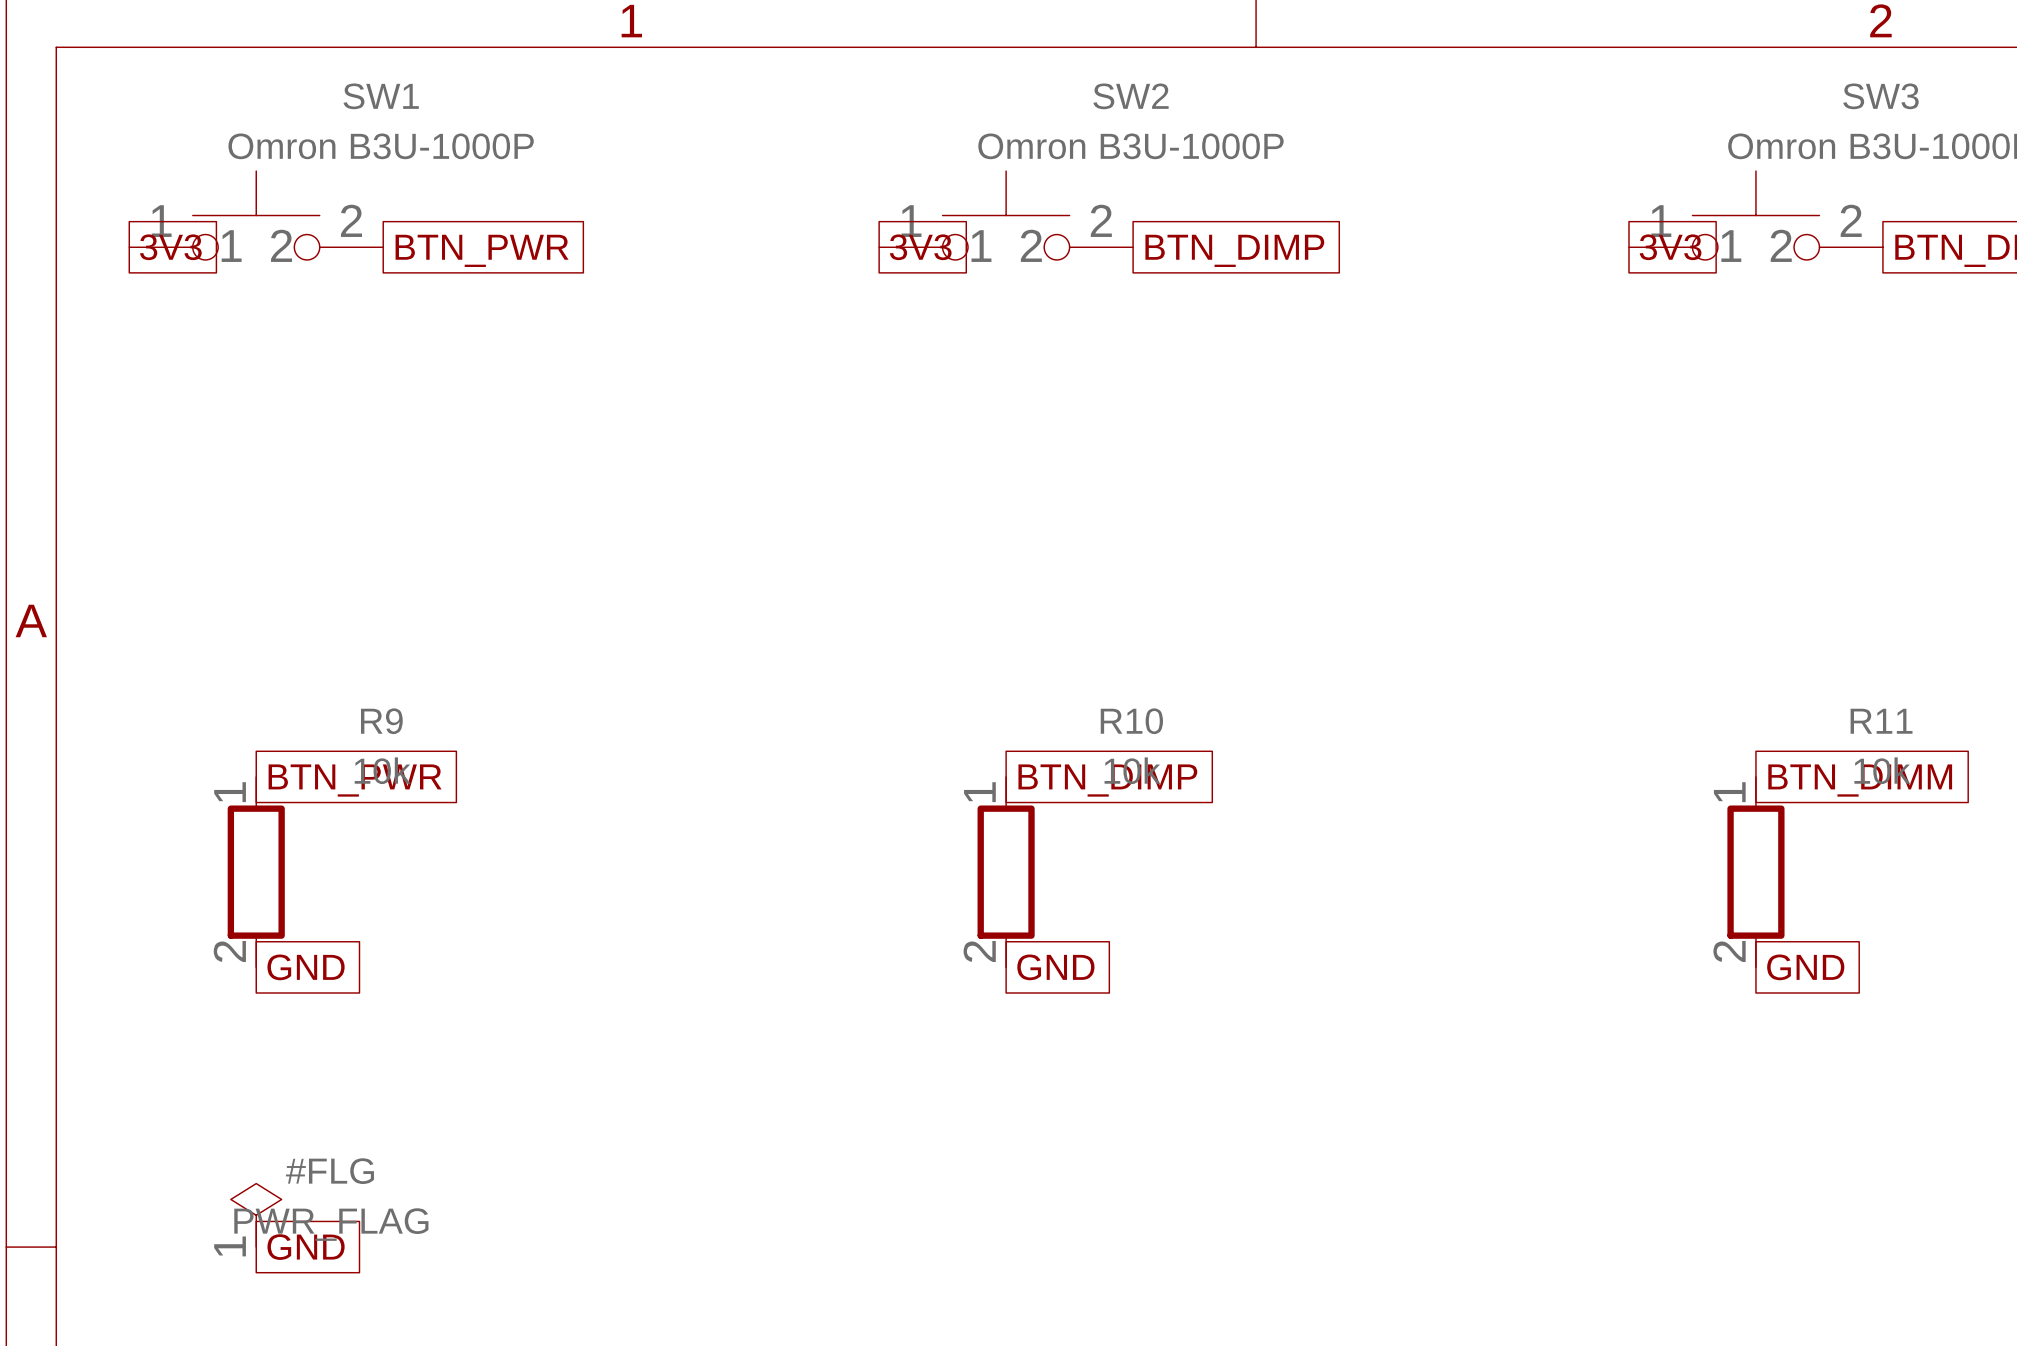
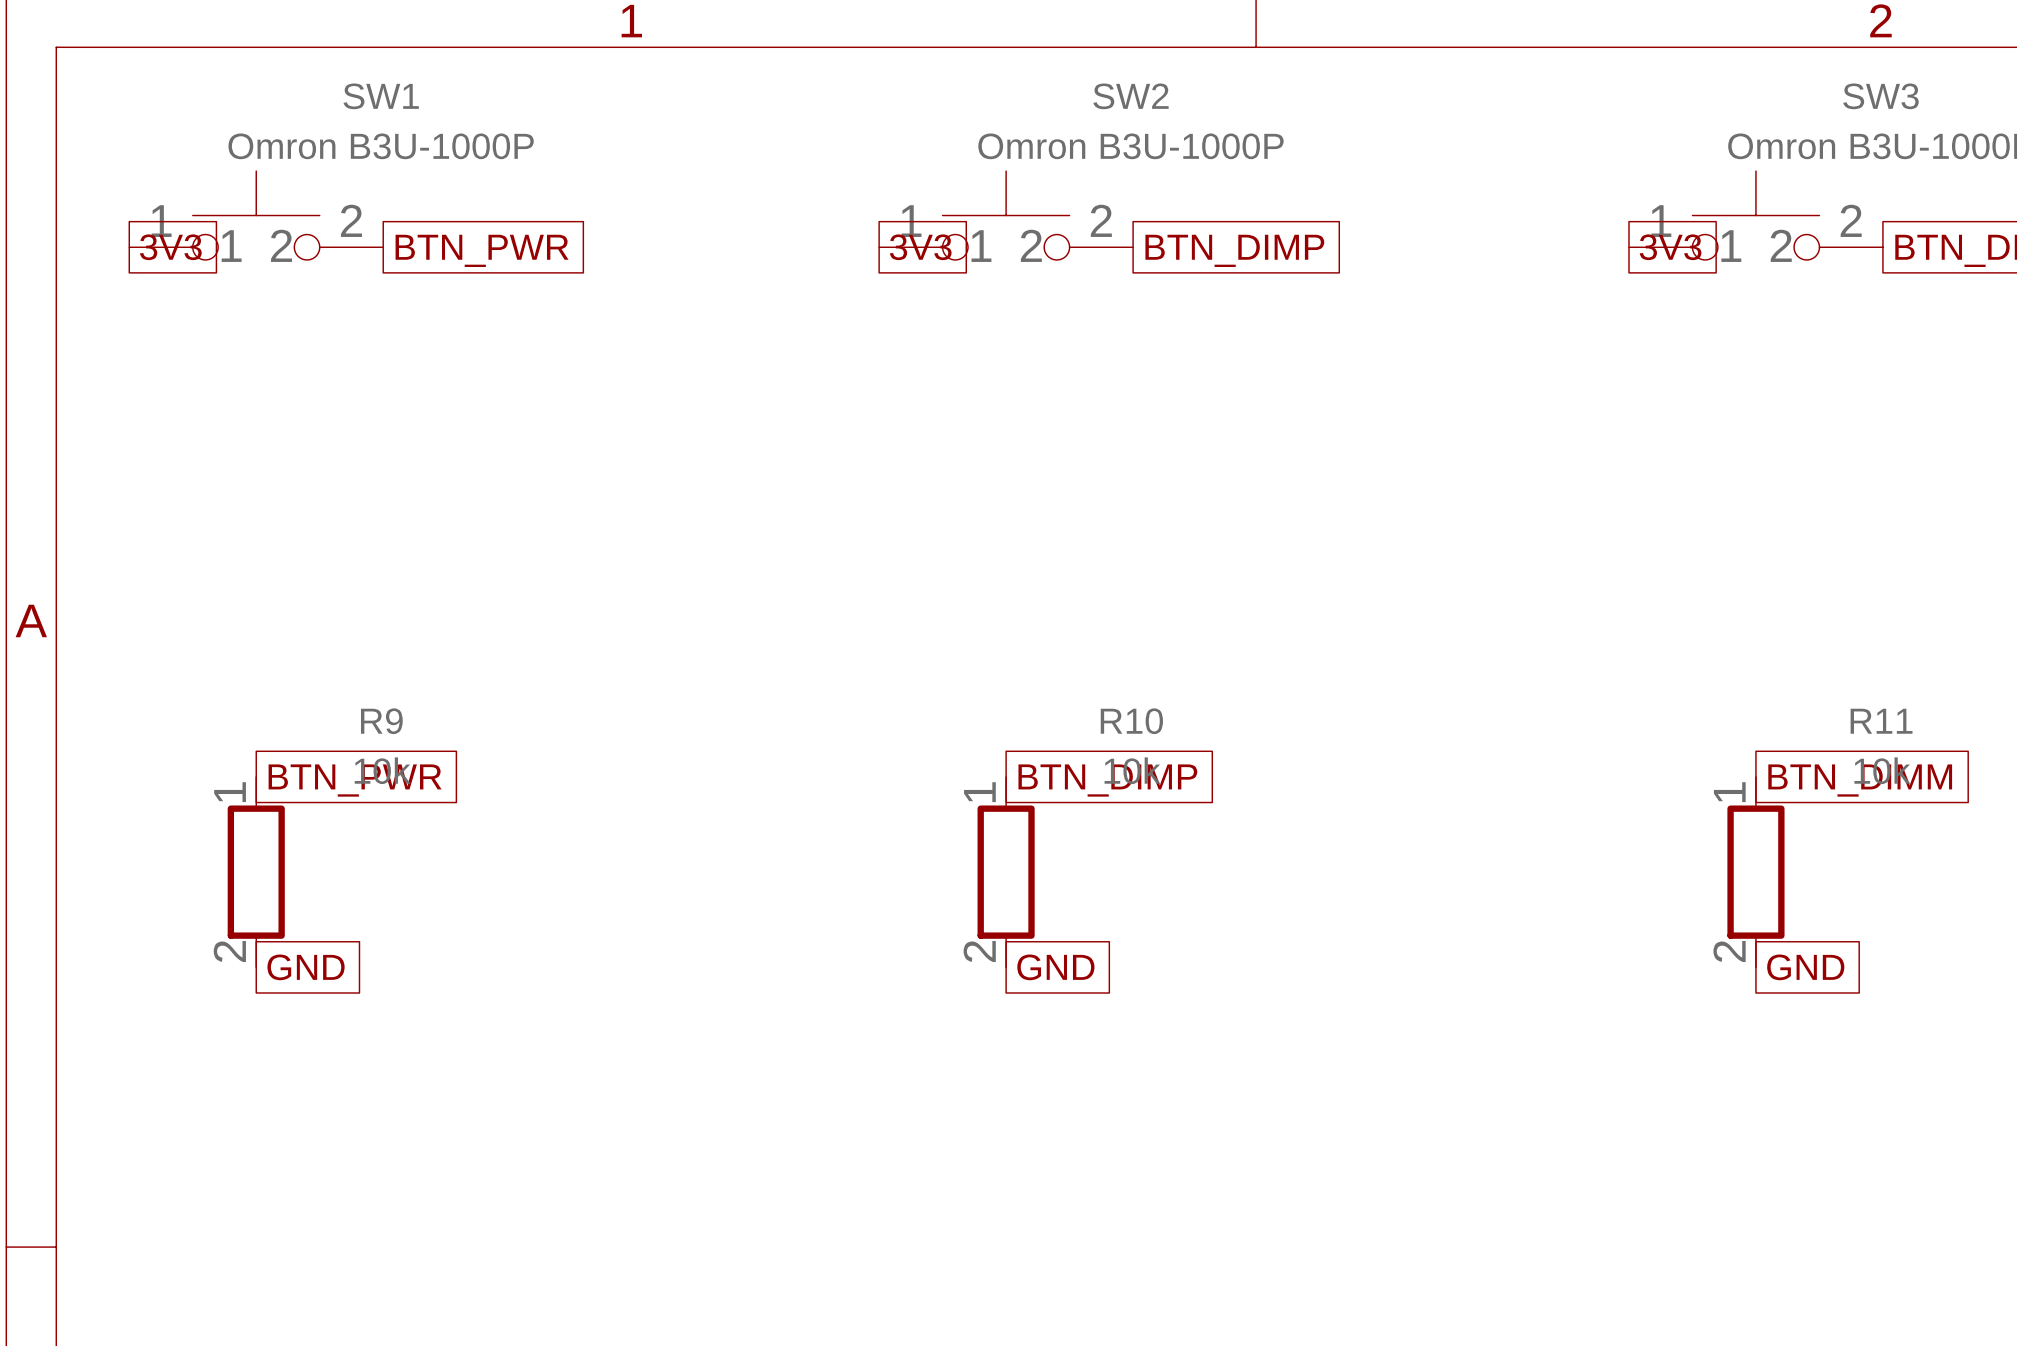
#FLG: PWR_FLAG (256, 1215) -> none
global label: GND (306, 1247) -> none

